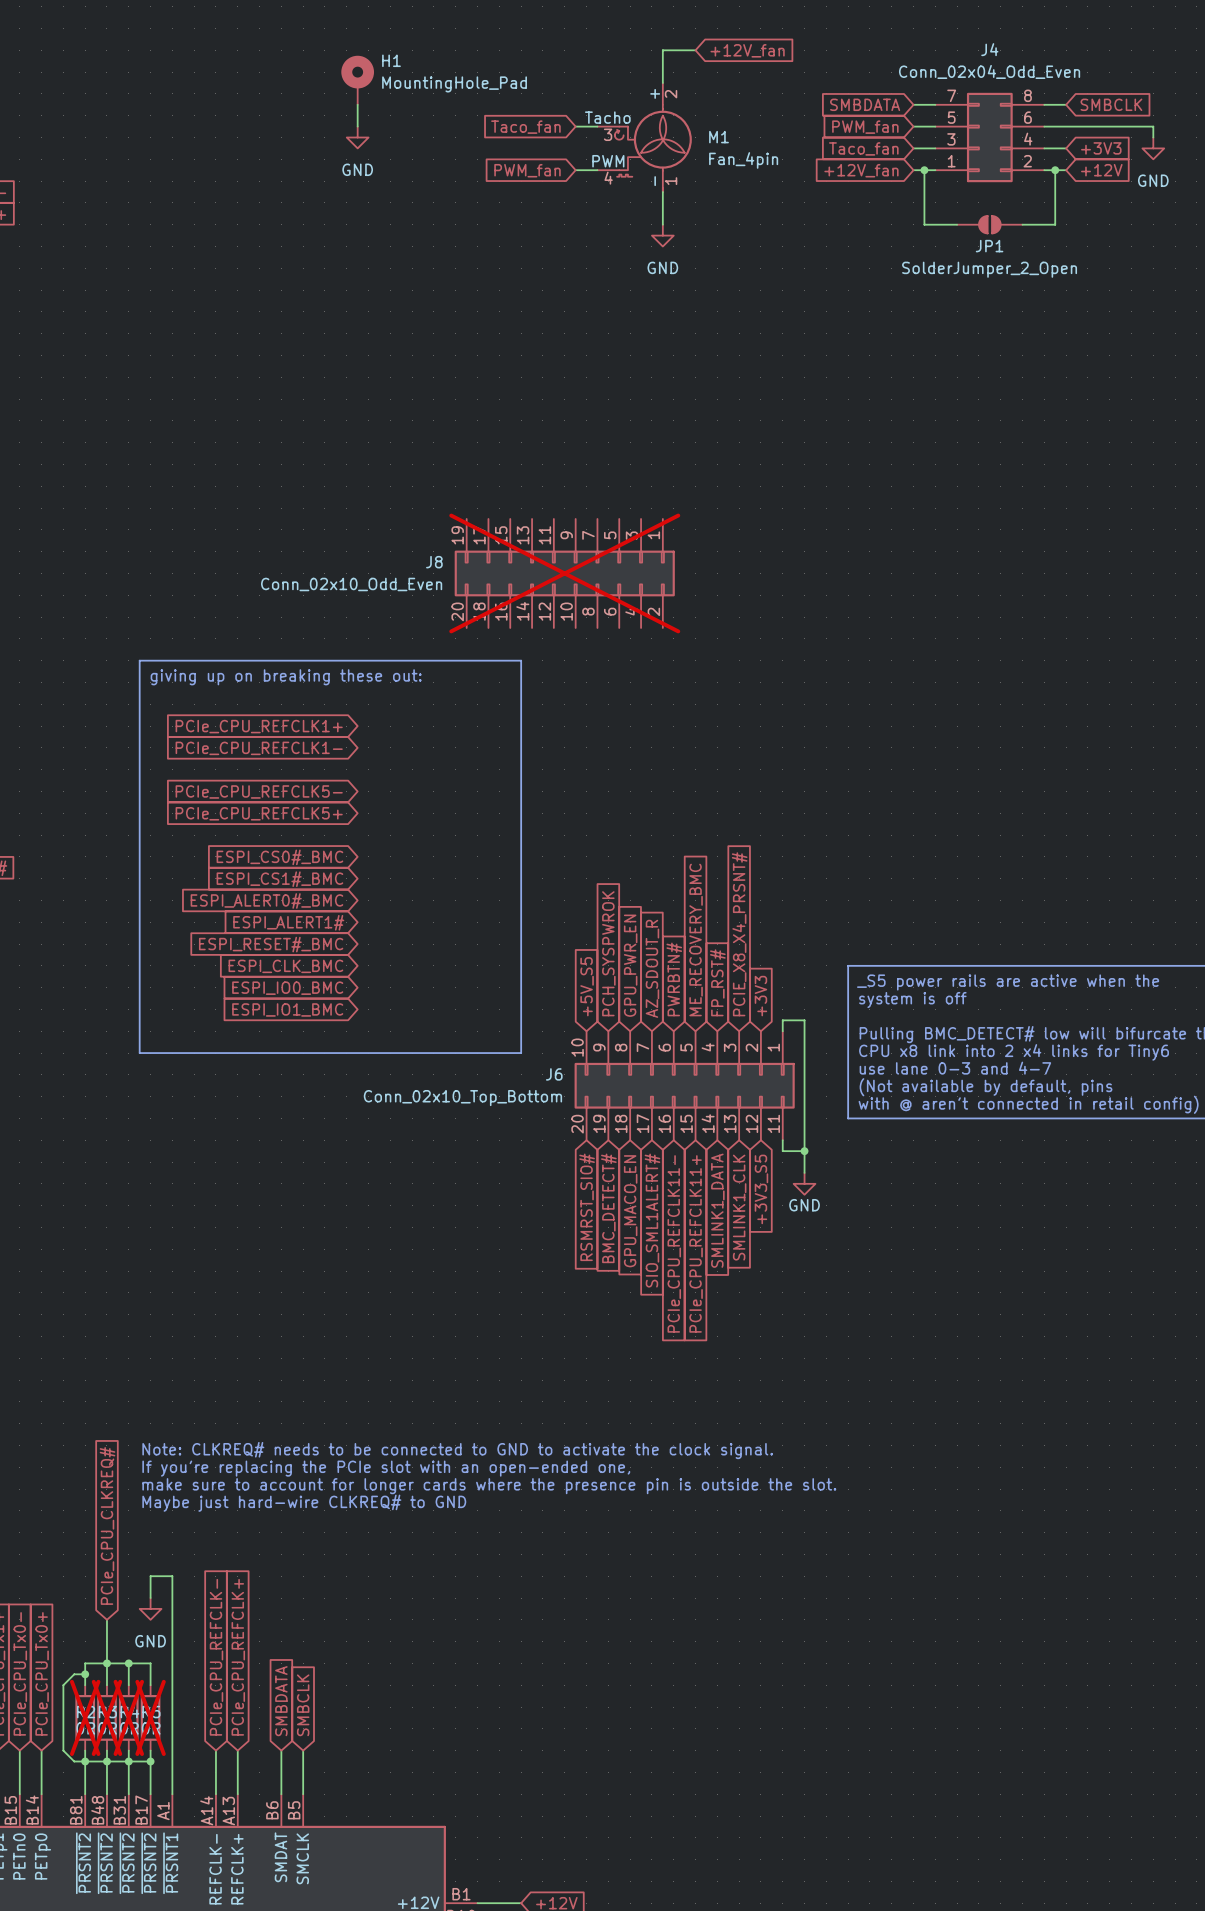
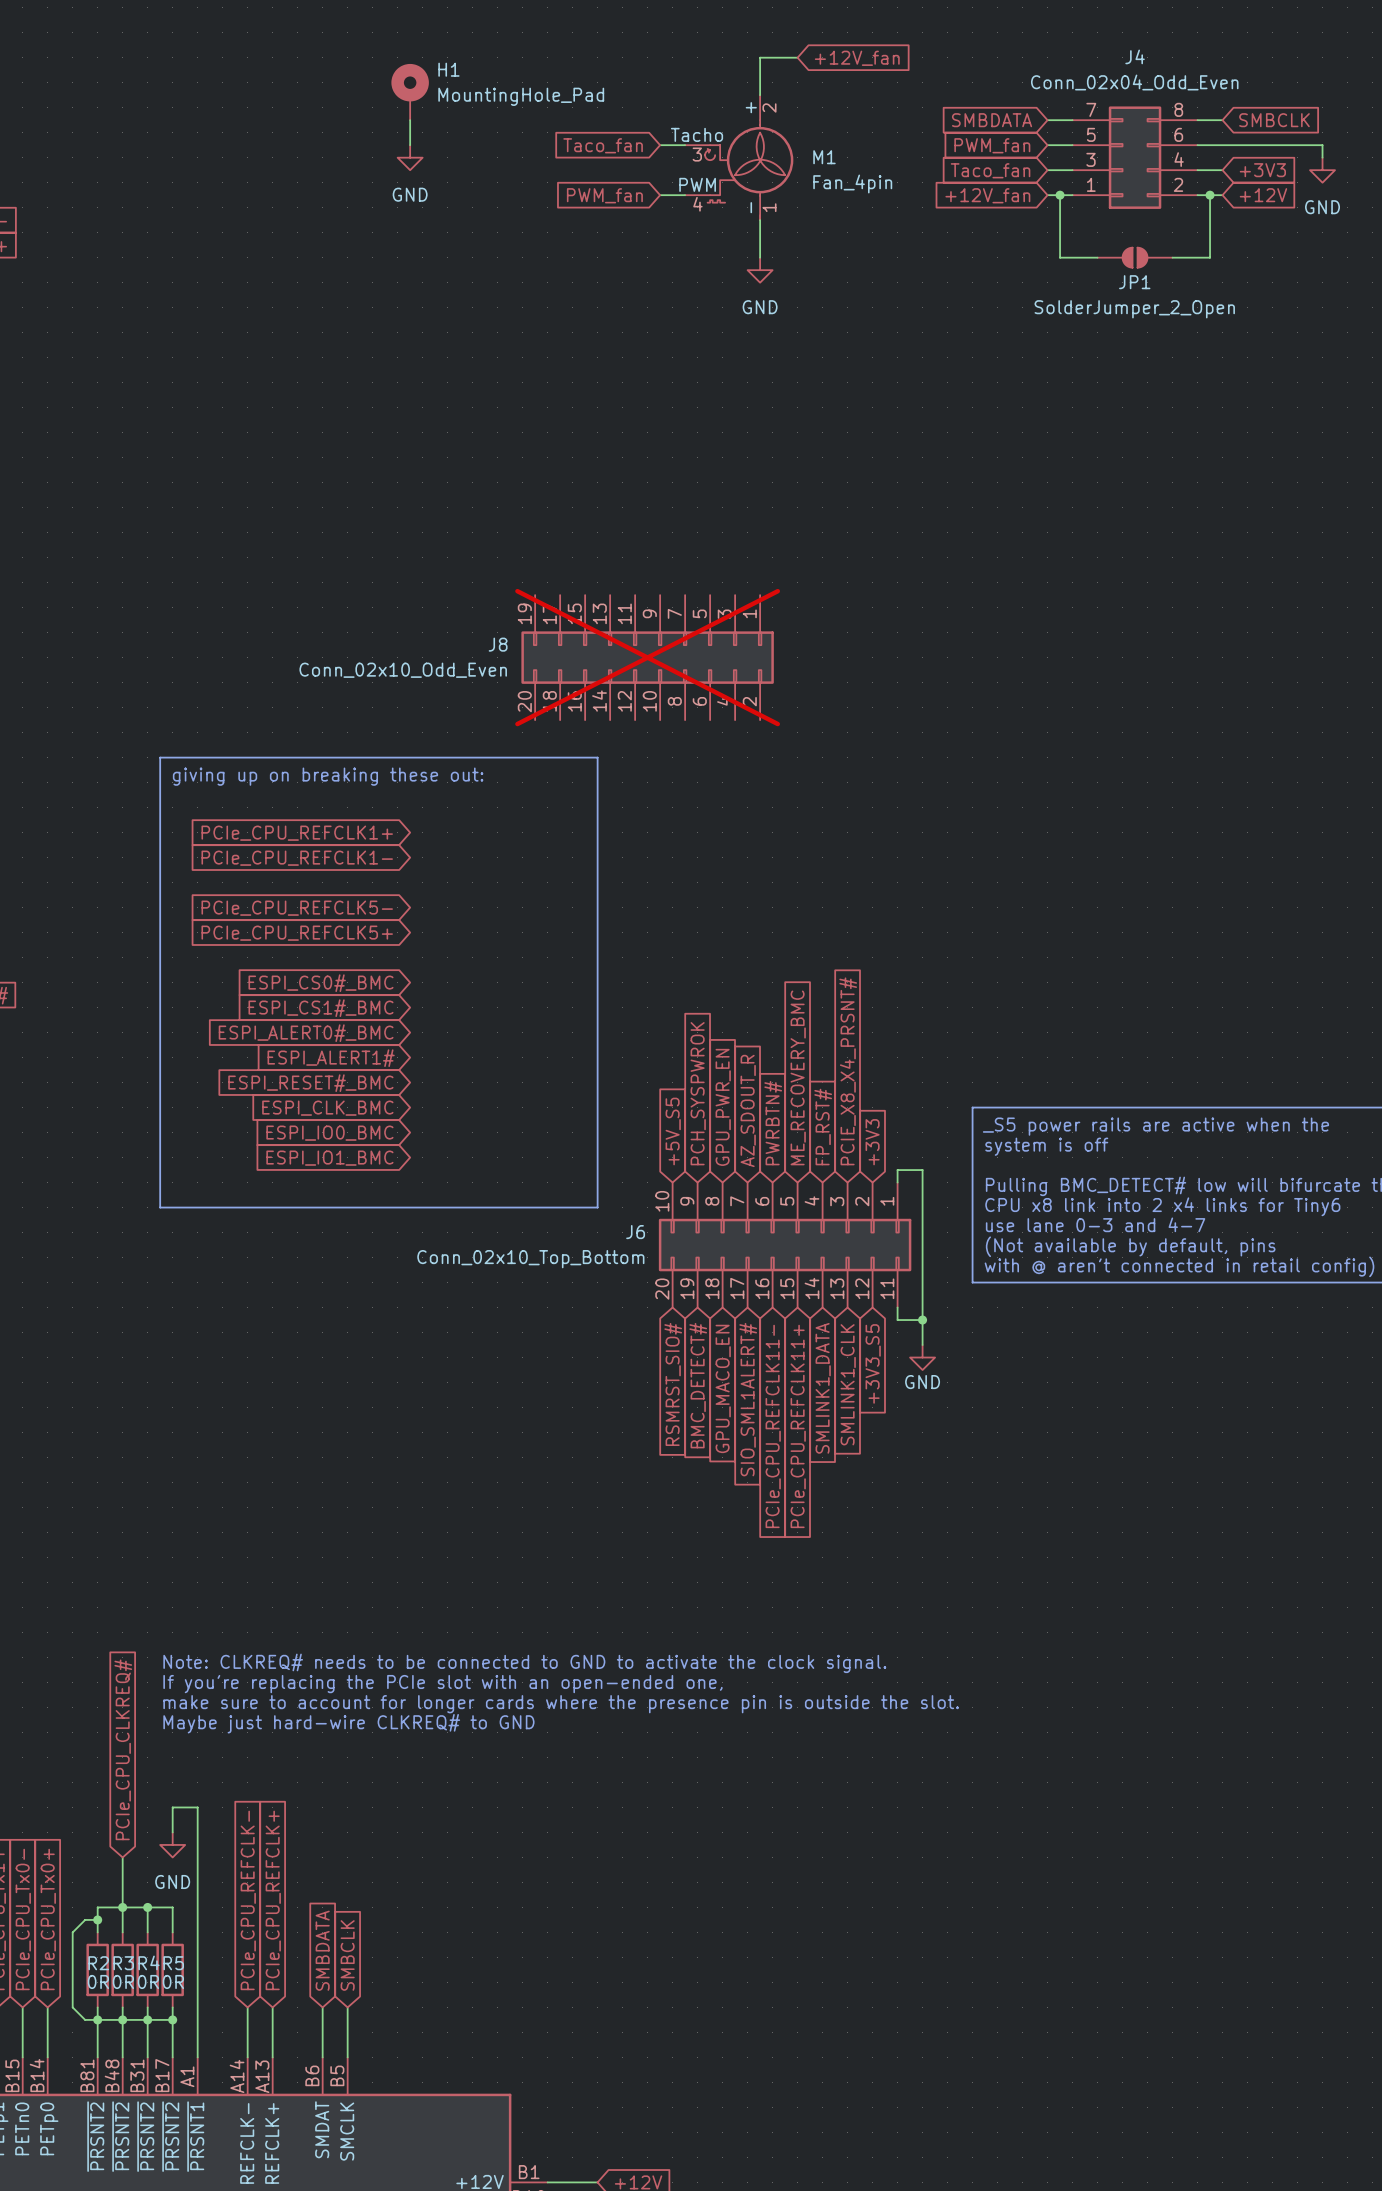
R2 do-not-place cross: (85, 1717) -> none
R3 do-not-place cross: (106, 1717) -> none
R4 do-not-place cross: (128, 1717) -> none
R5 do-not-place cross: (150, 1717) -> none

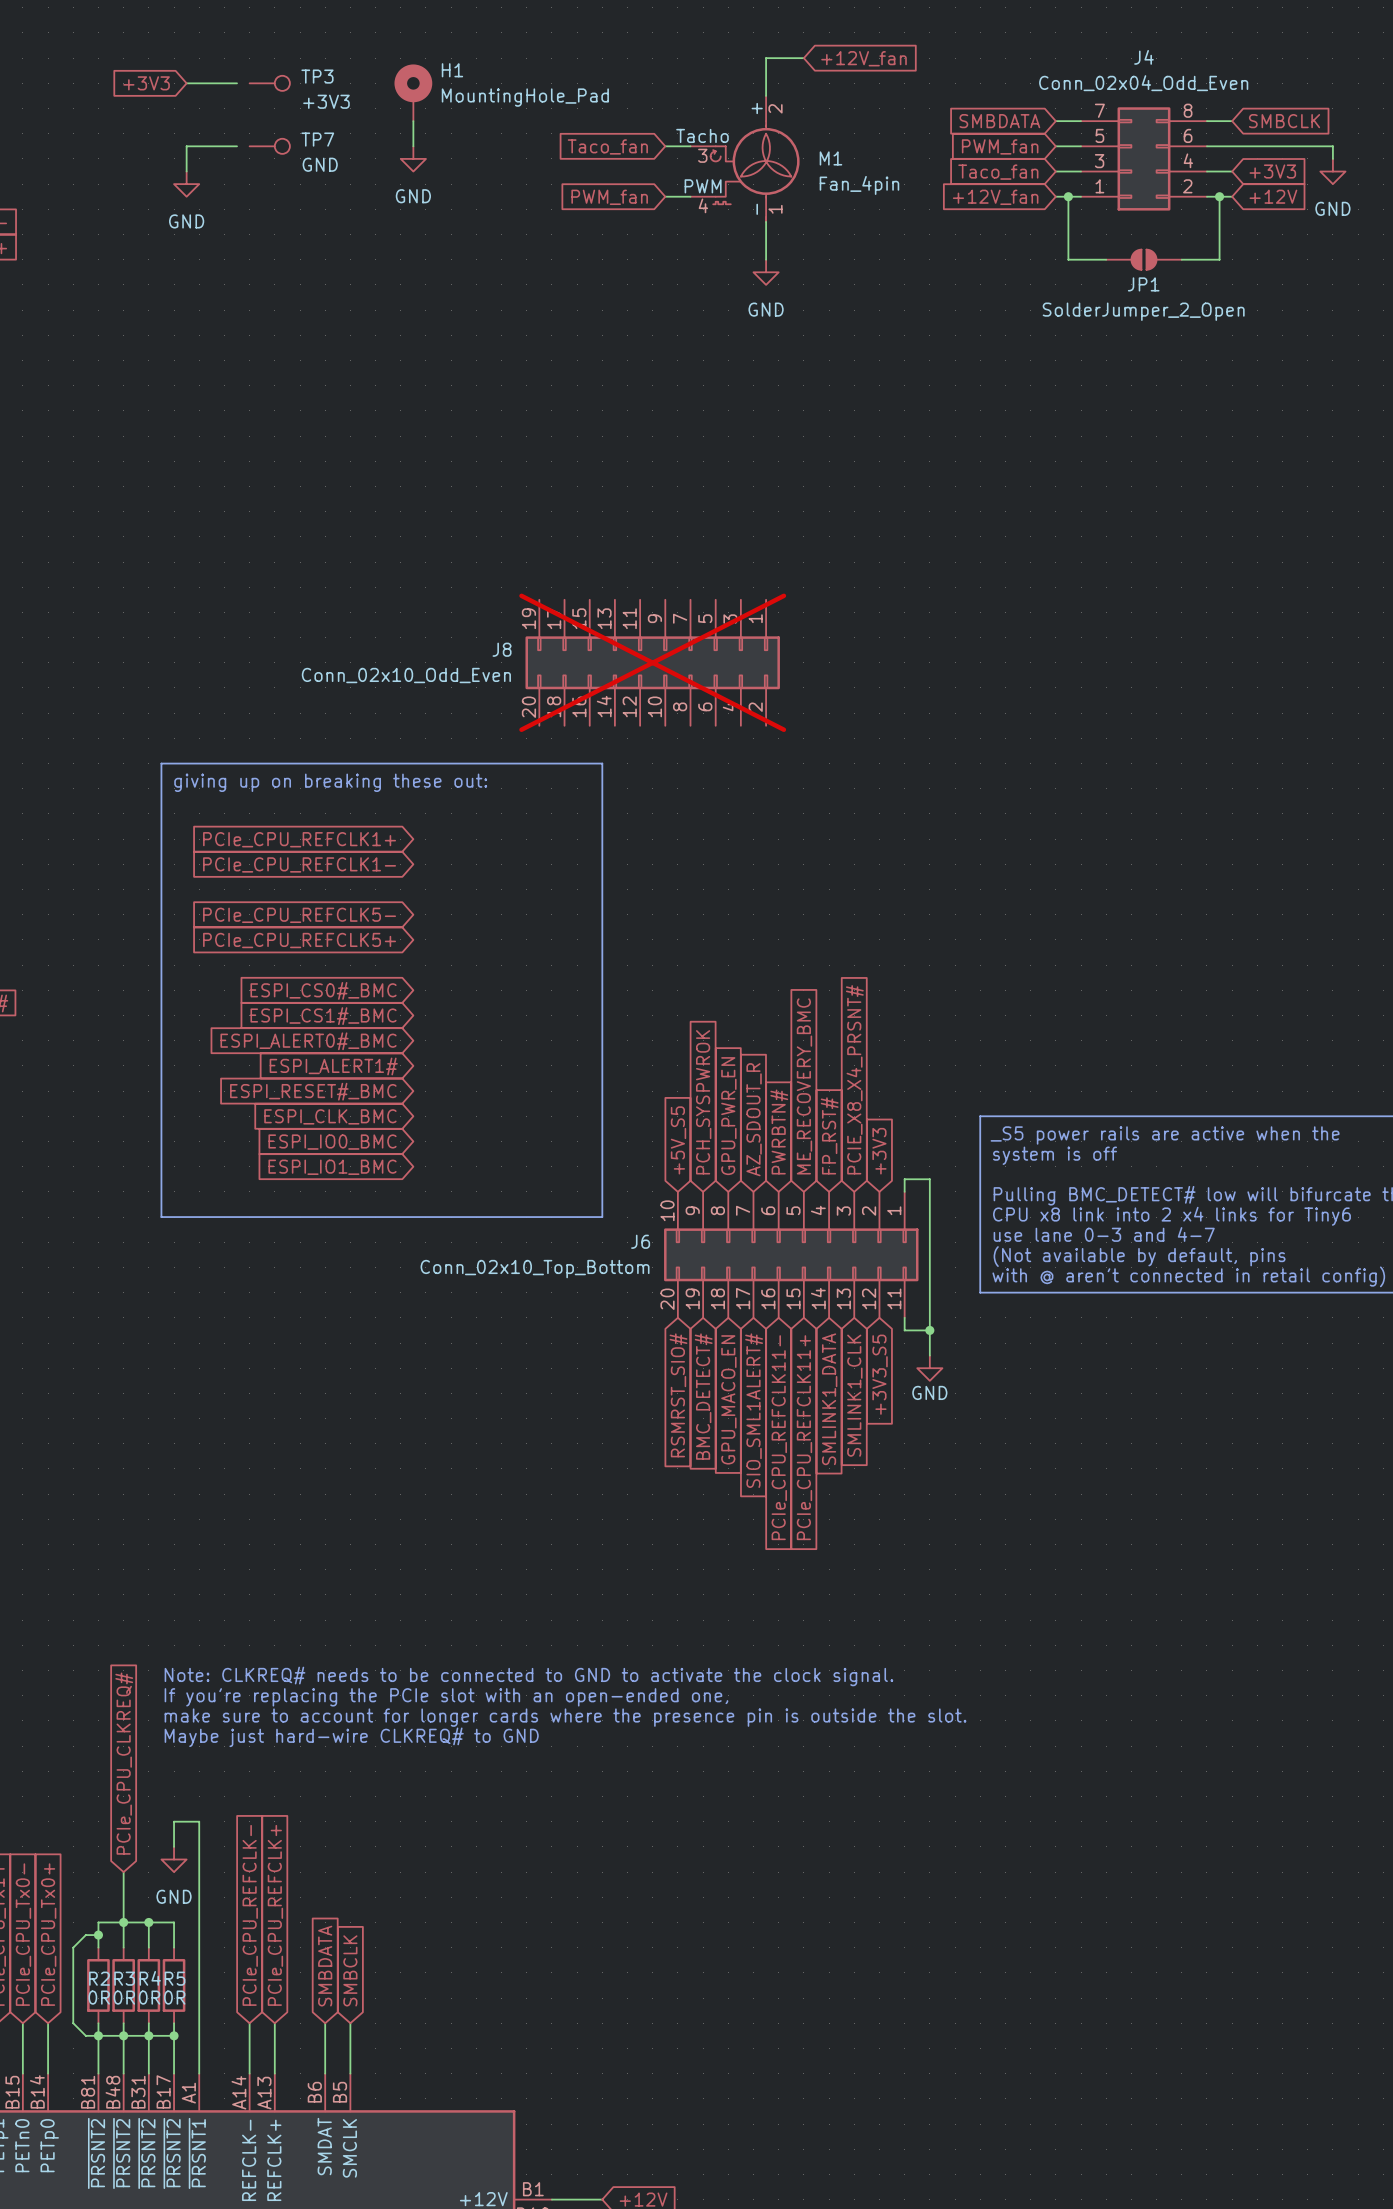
global label: none -> +3V3 (146, 83)
wire: none -> (186, 83) (237, 83)
TP3: none -> +3V3 (269, 83)
wire: none -> (237, 146) (186, 146) (186, 171)
TP7: none -> GND (269, 146)
power symbol: none -> GND (186, 184)

